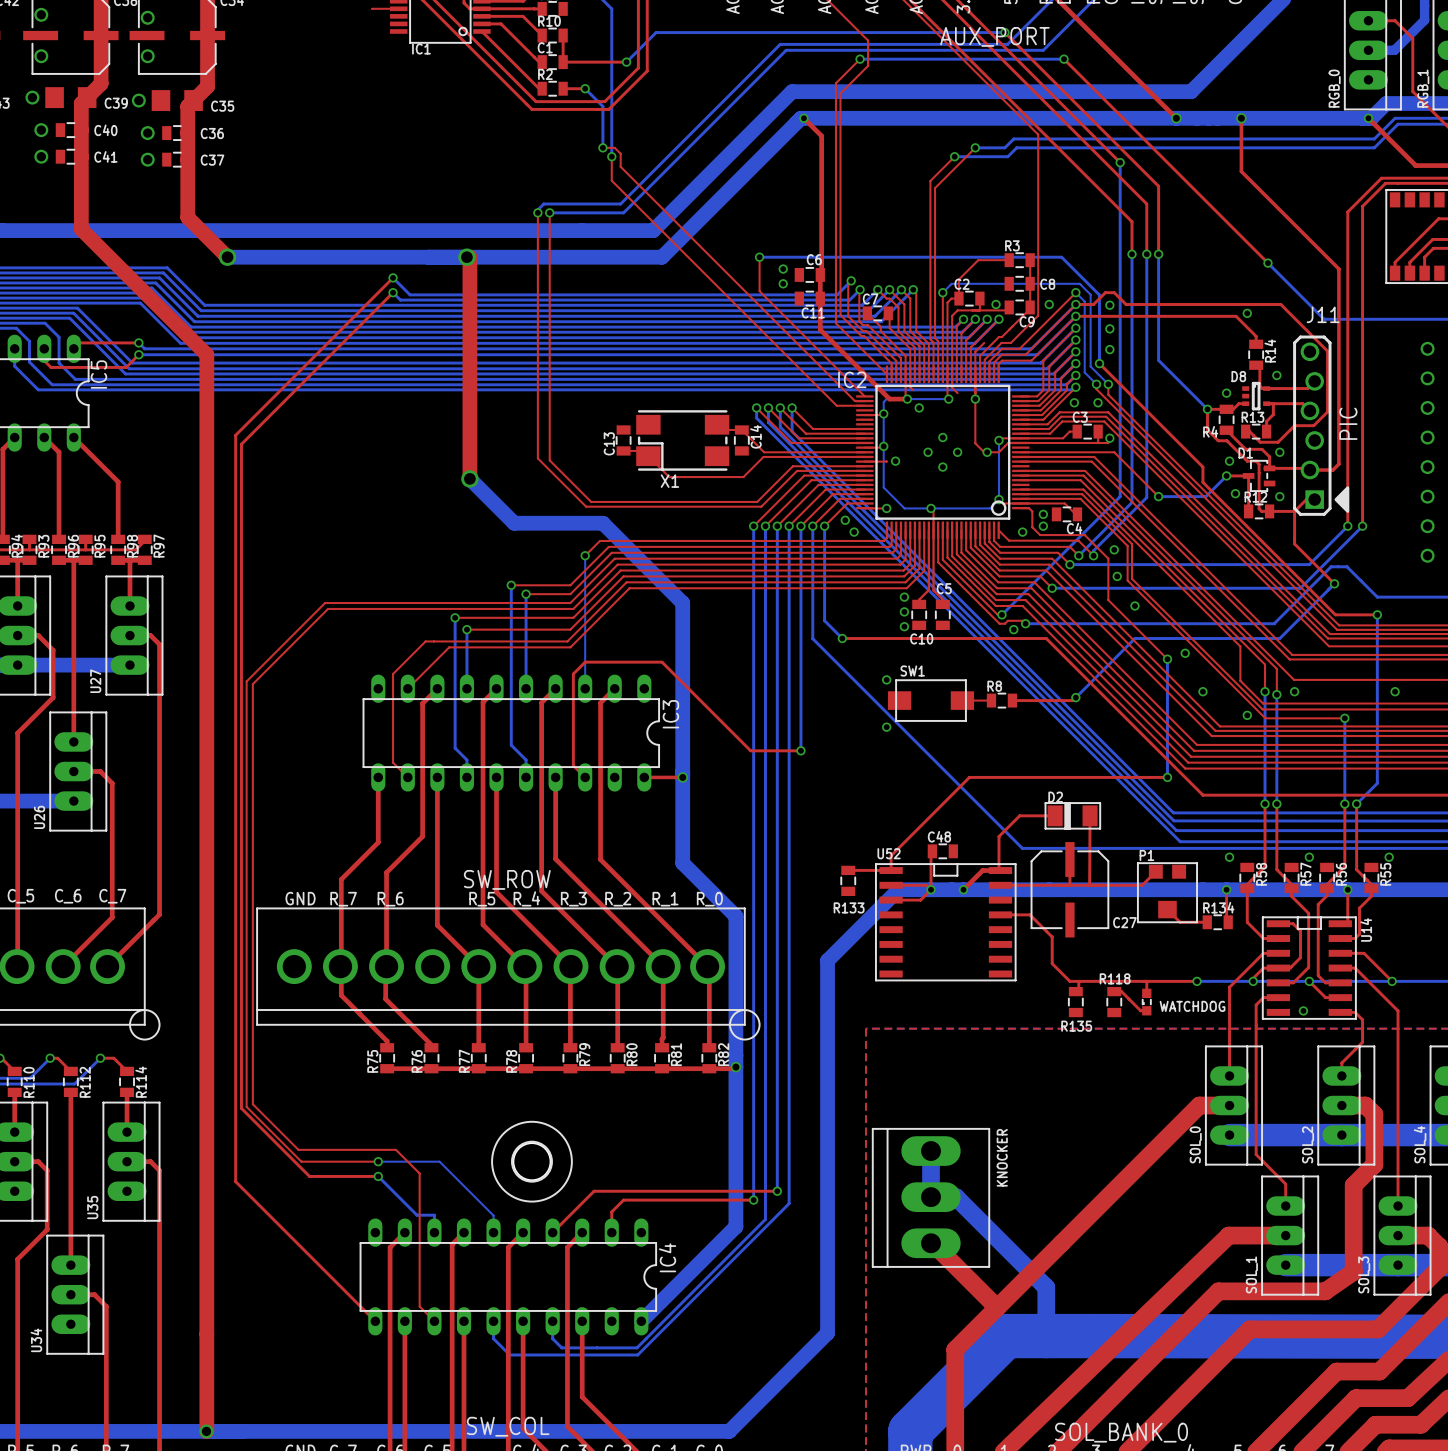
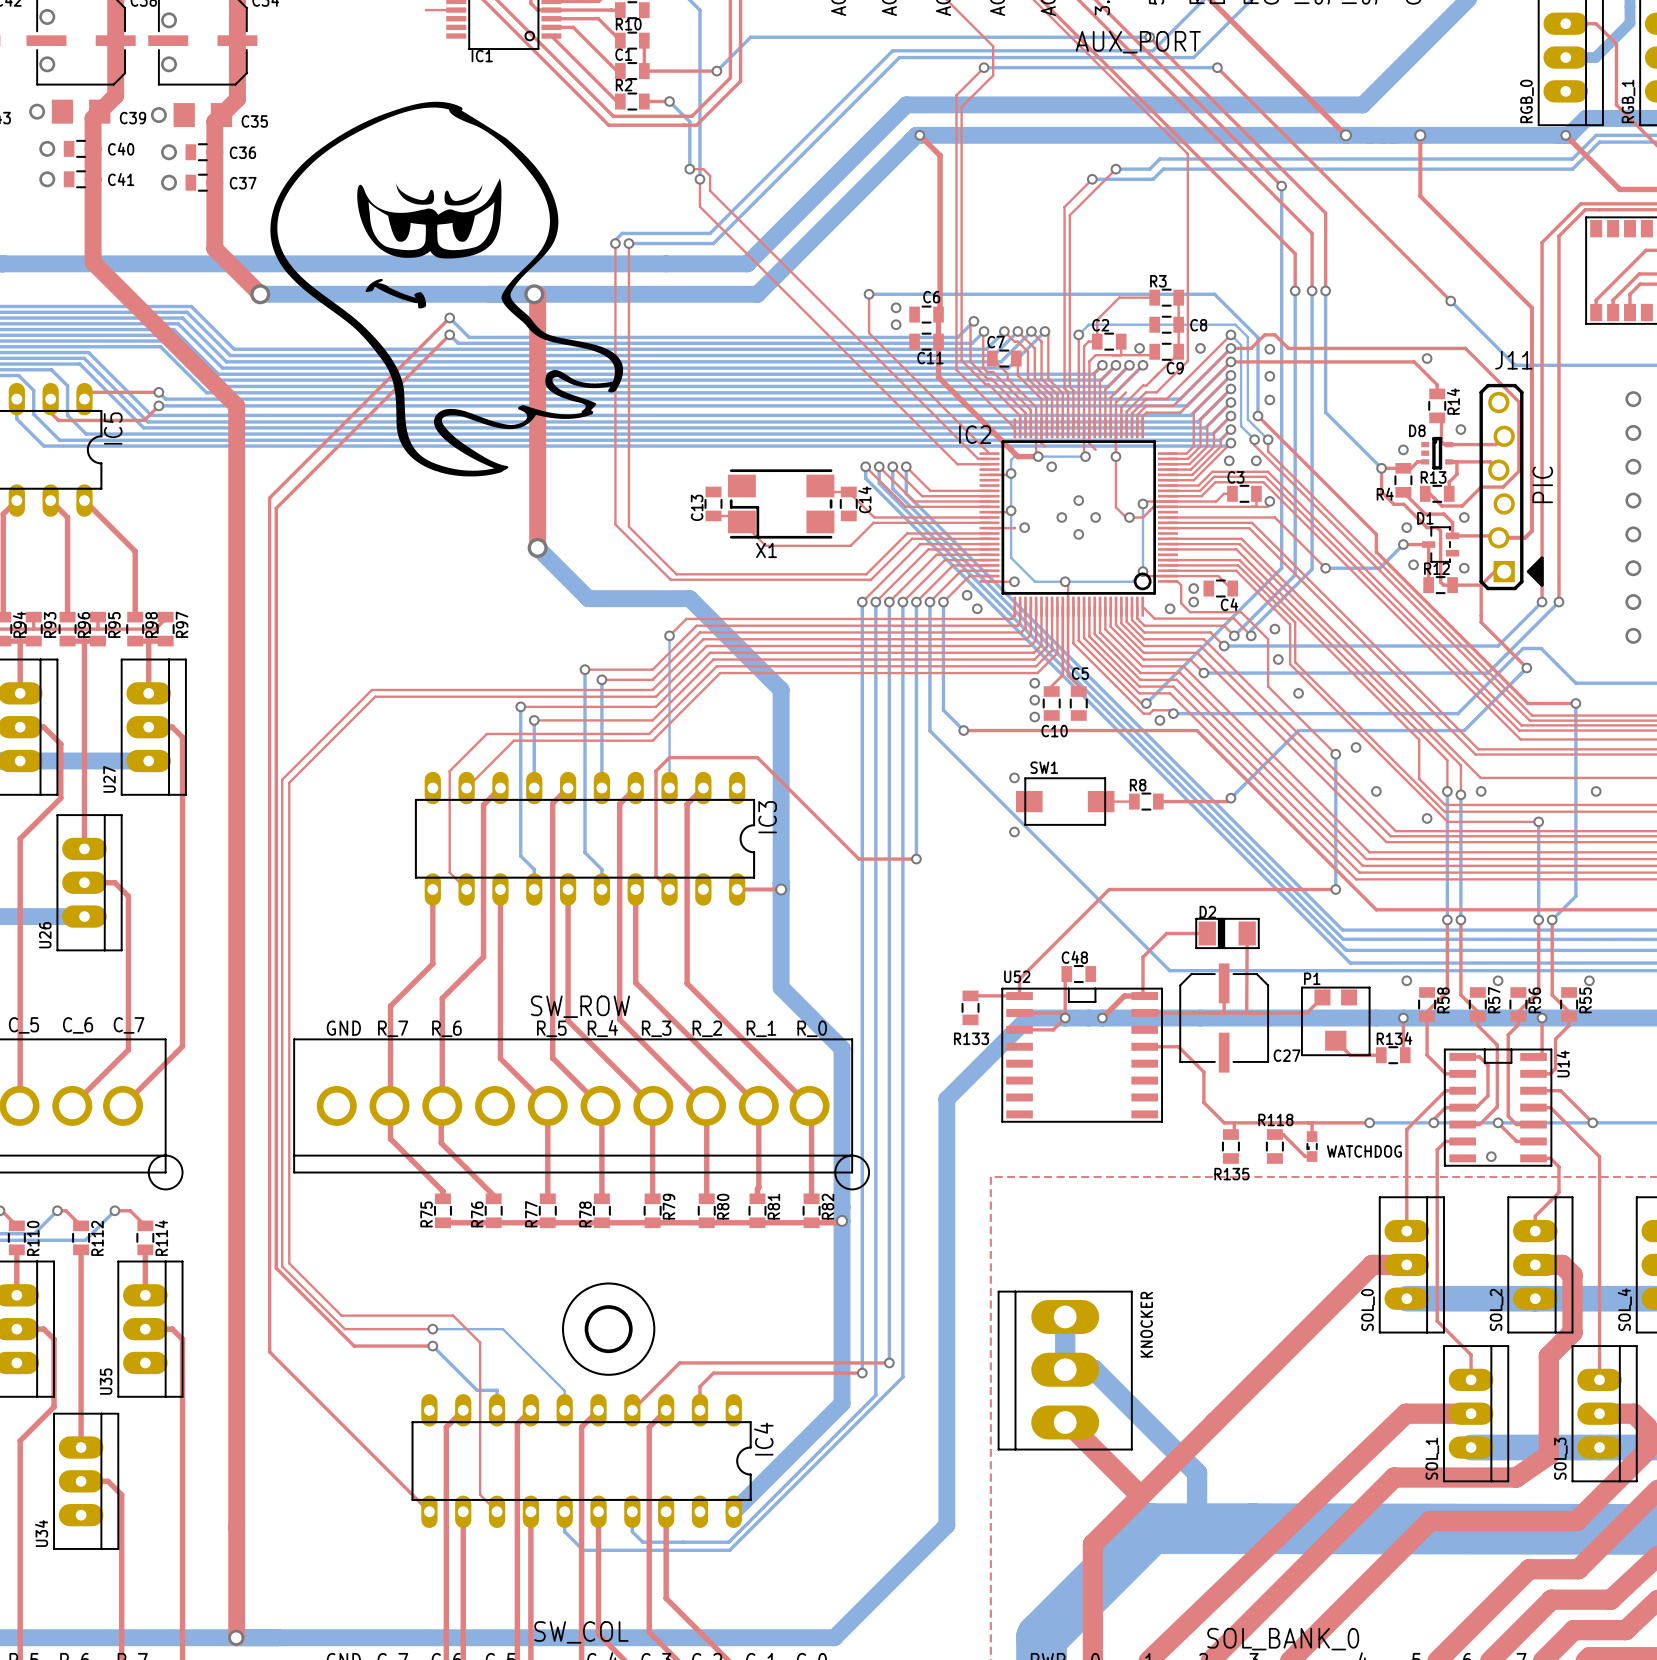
drawing: none -> [270, 101, 624, 477]

